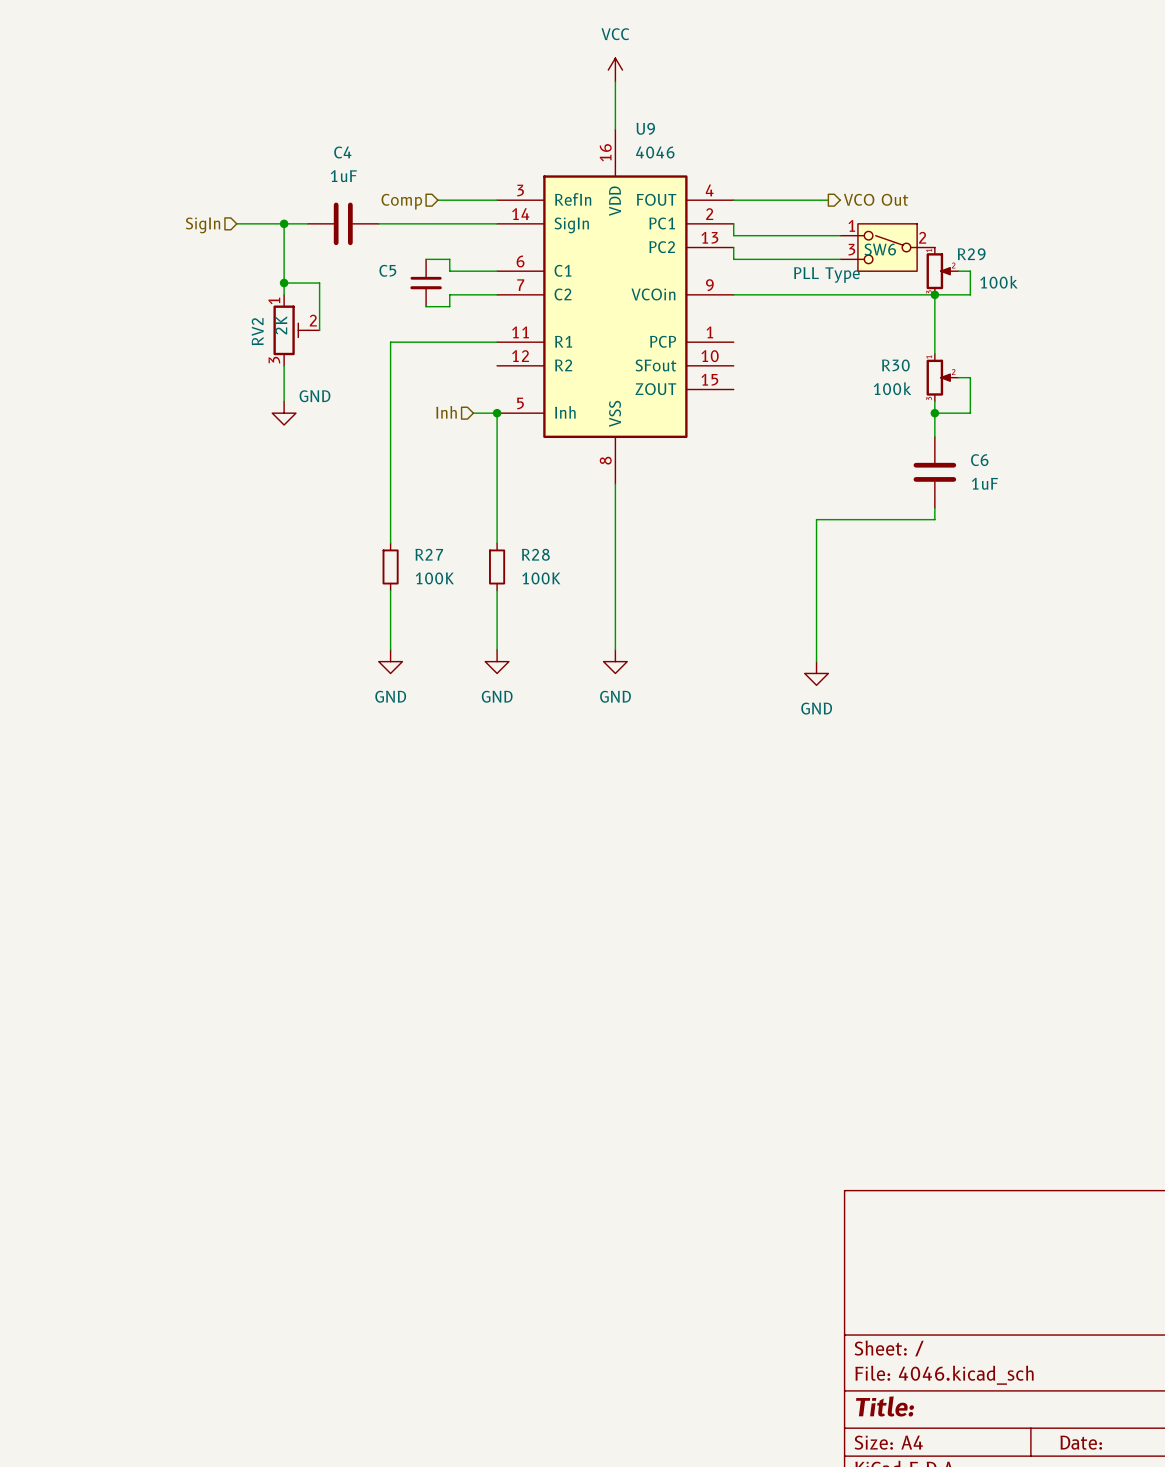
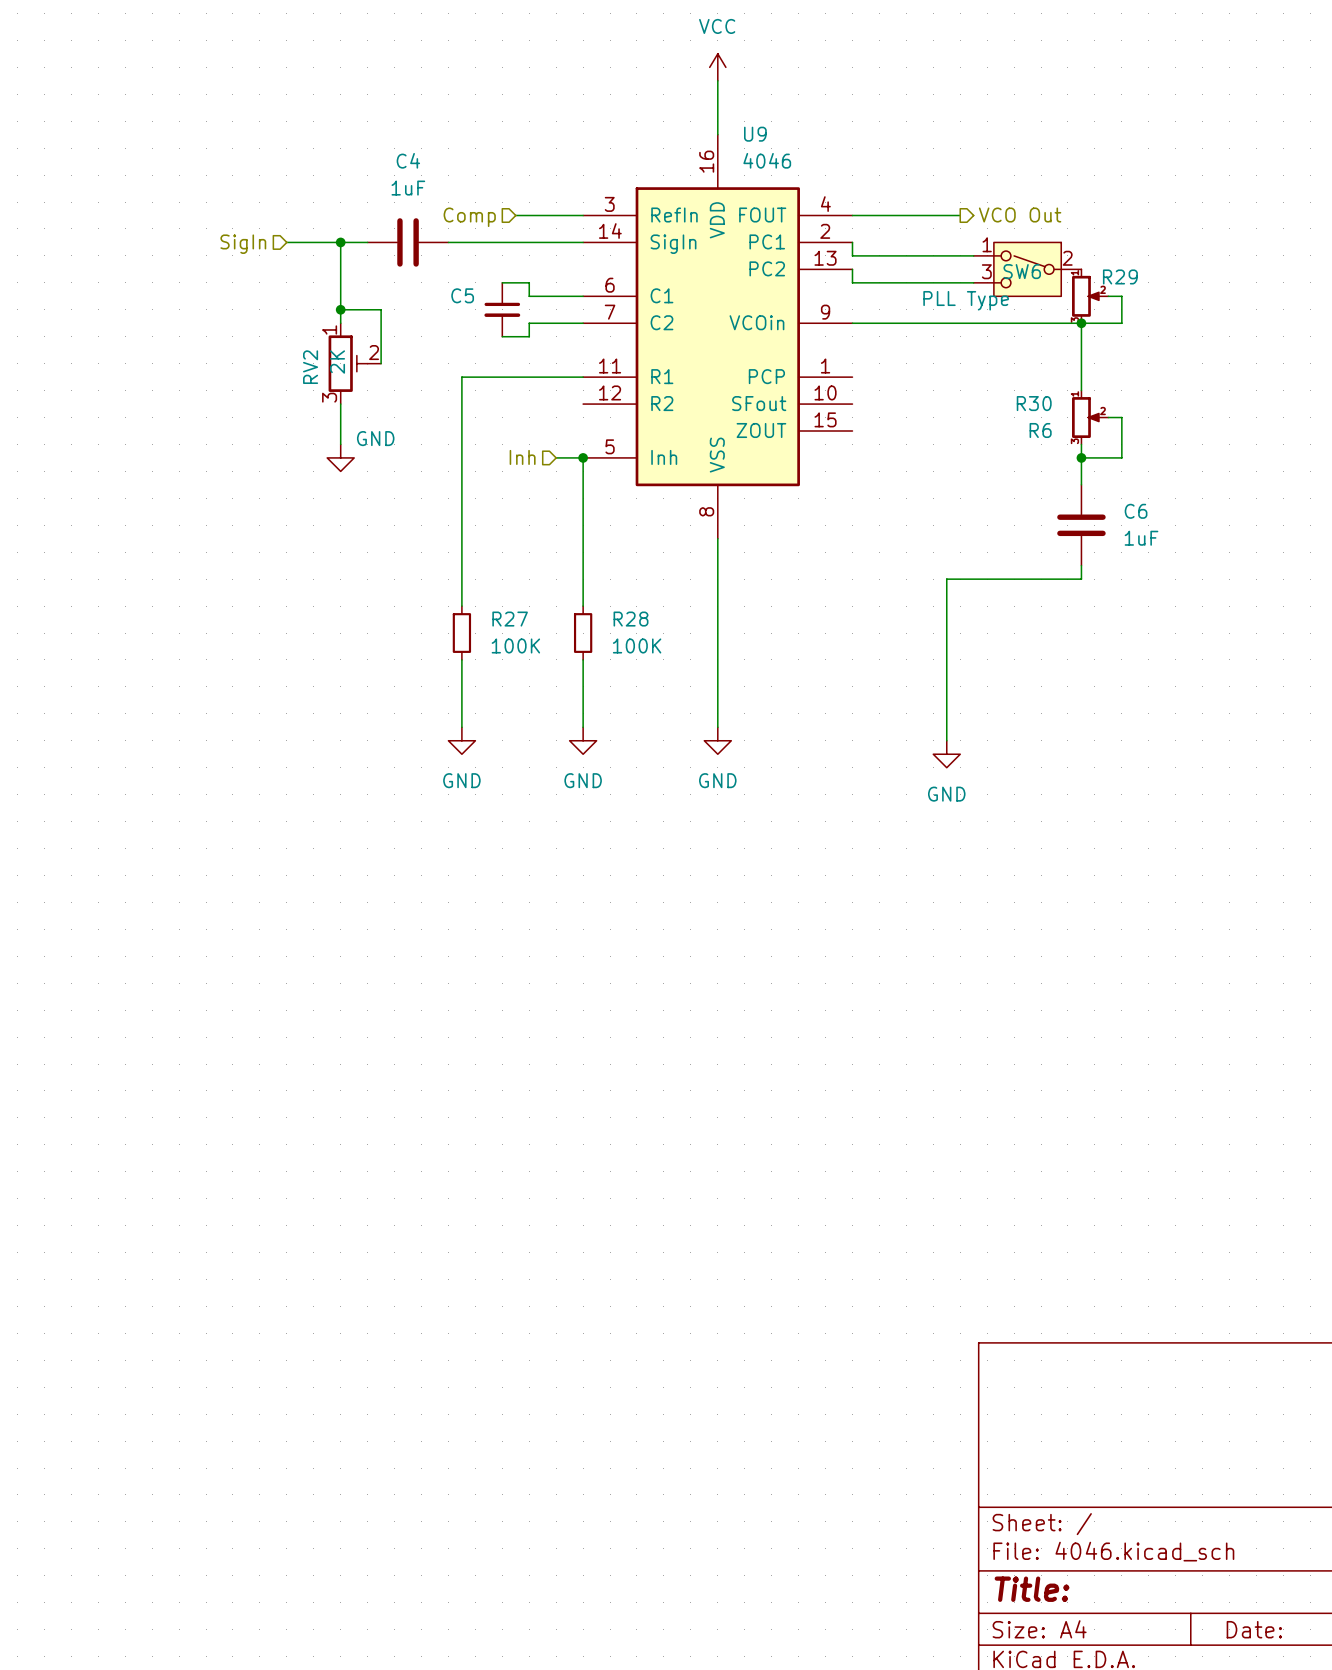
R29 value: 100k (998, 282) -> none
R30 value: 100k (892, 388) -> R6 (1040, 430)

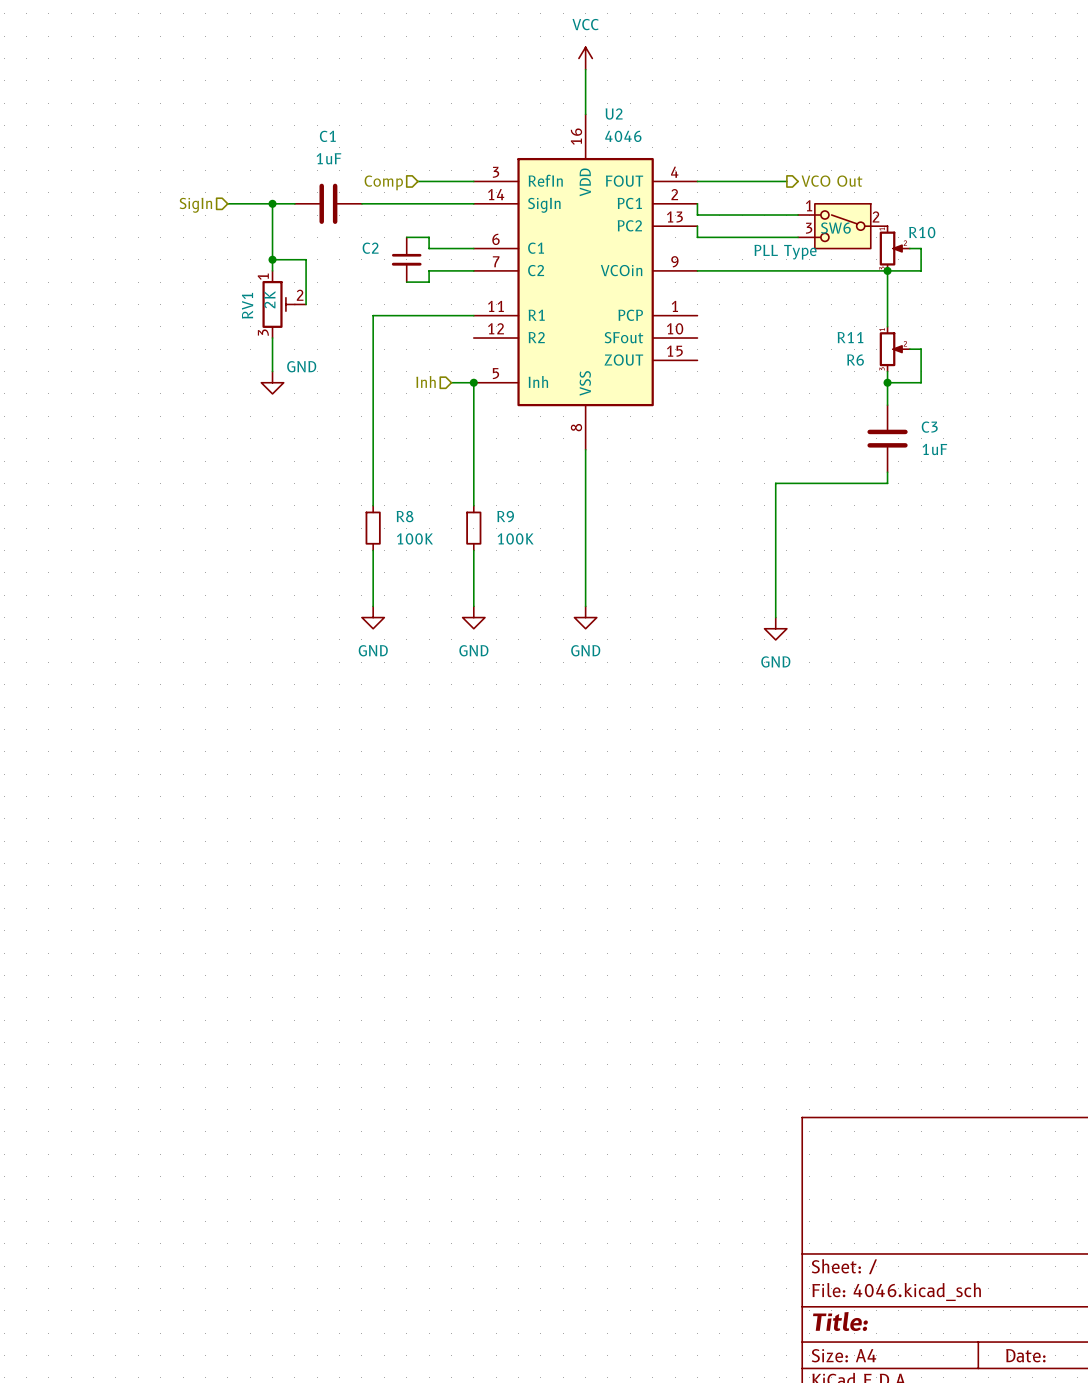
U9 name: U9 (755, 134) -> U2 (614, 114)
C4 name: C4 (408, 160) -> C1 (327, 136)
R29 name: R29 (1120, 276) -> R10 (922, 232)
C5 name: C5 (462, 295) -> C2 (370, 248)
RV2 name: RV2 (310, 367) -> RV1 (247, 305)
R30 name: R30 (1034, 403) -> R11 (850, 337)
C6 name: C6 (1136, 511) -> C3 (929, 427)
R27 name: R27 (510, 619) -> R8 (405, 516)
R28 name: R28 (631, 619) -> R9 (505, 516)

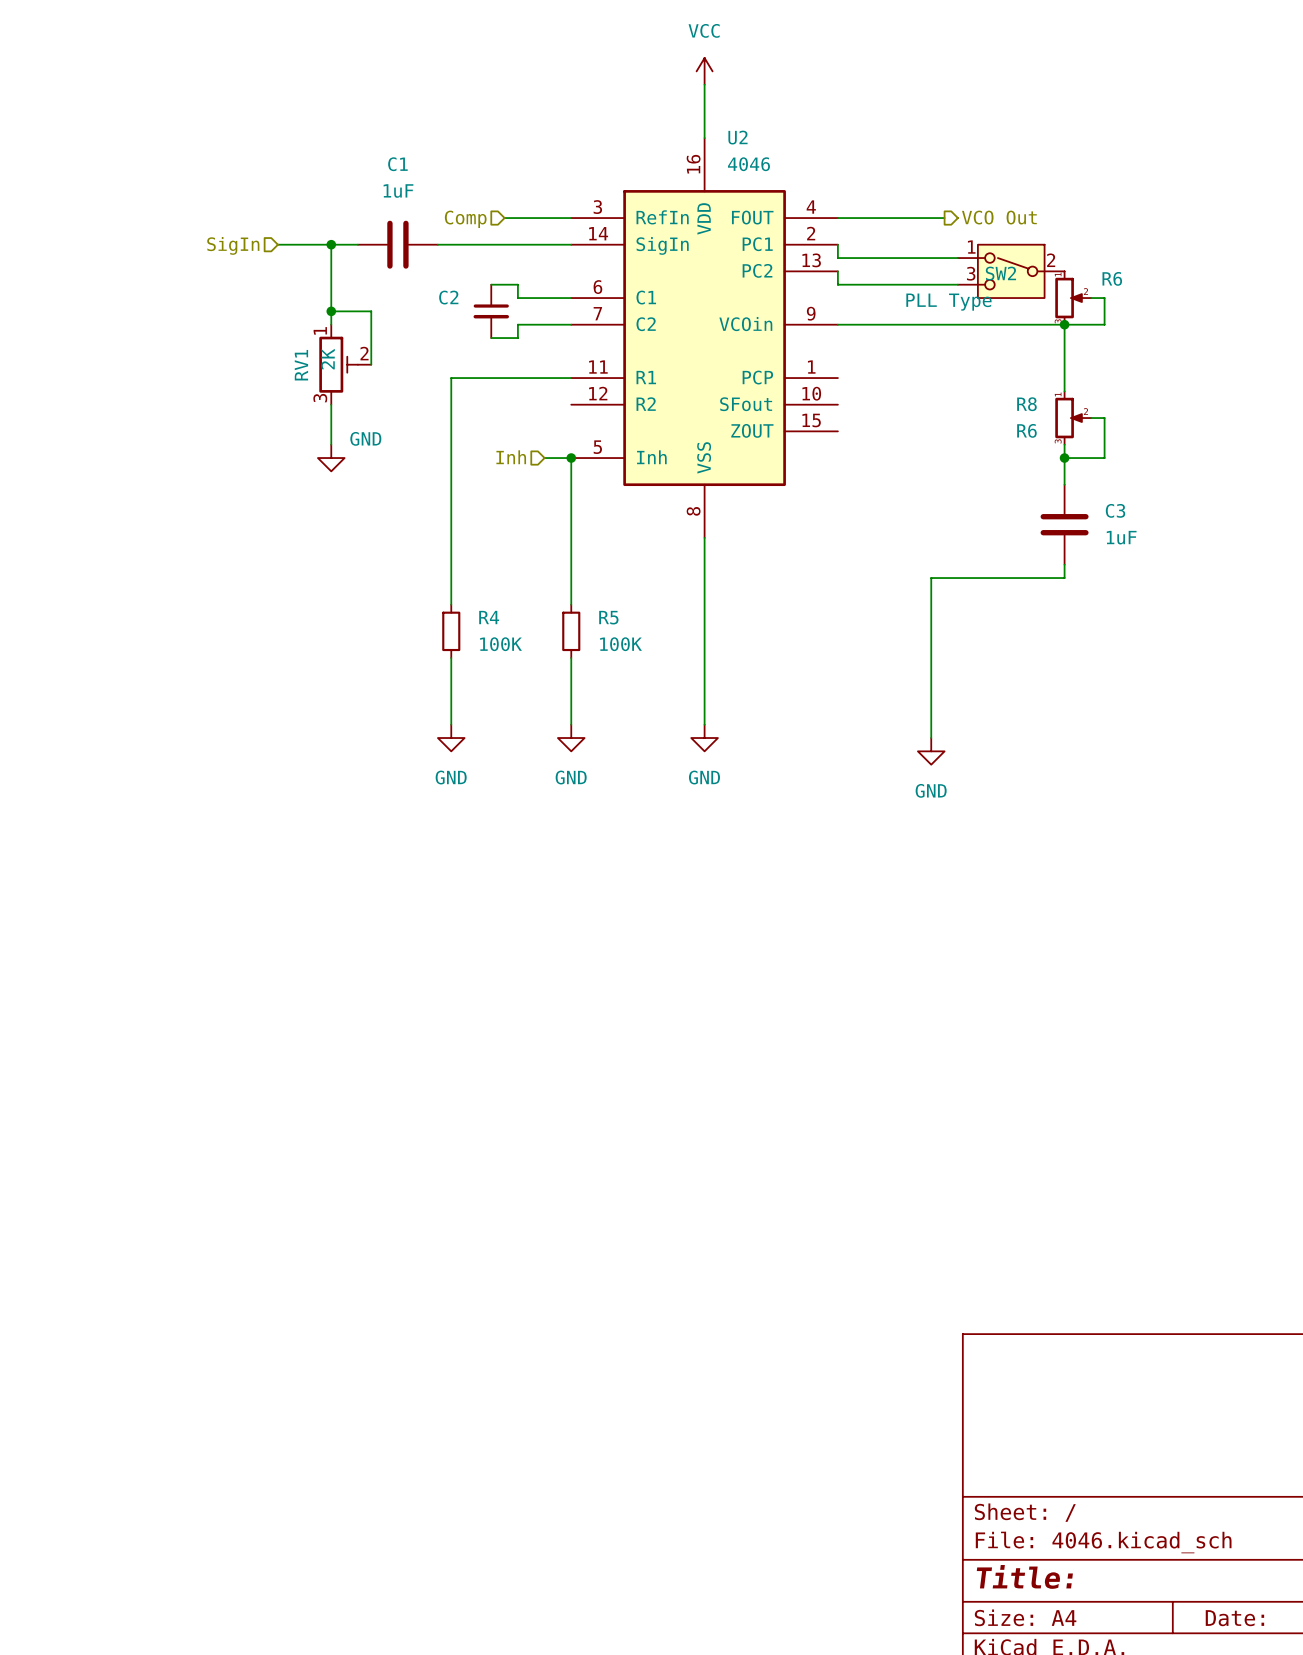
SW6 name: SW6 (835, 228) -> SW2 (1000, 273)
R10 name: R10 (922, 232) -> R6 (1112, 278)
R11 name: R11 (850, 337) -> R8 (1026, 404)
R8 name: R8 (405, 516) -> R4 (489, 617)
R9 name: R9 (505, 516) -> R5 (608, 617)

